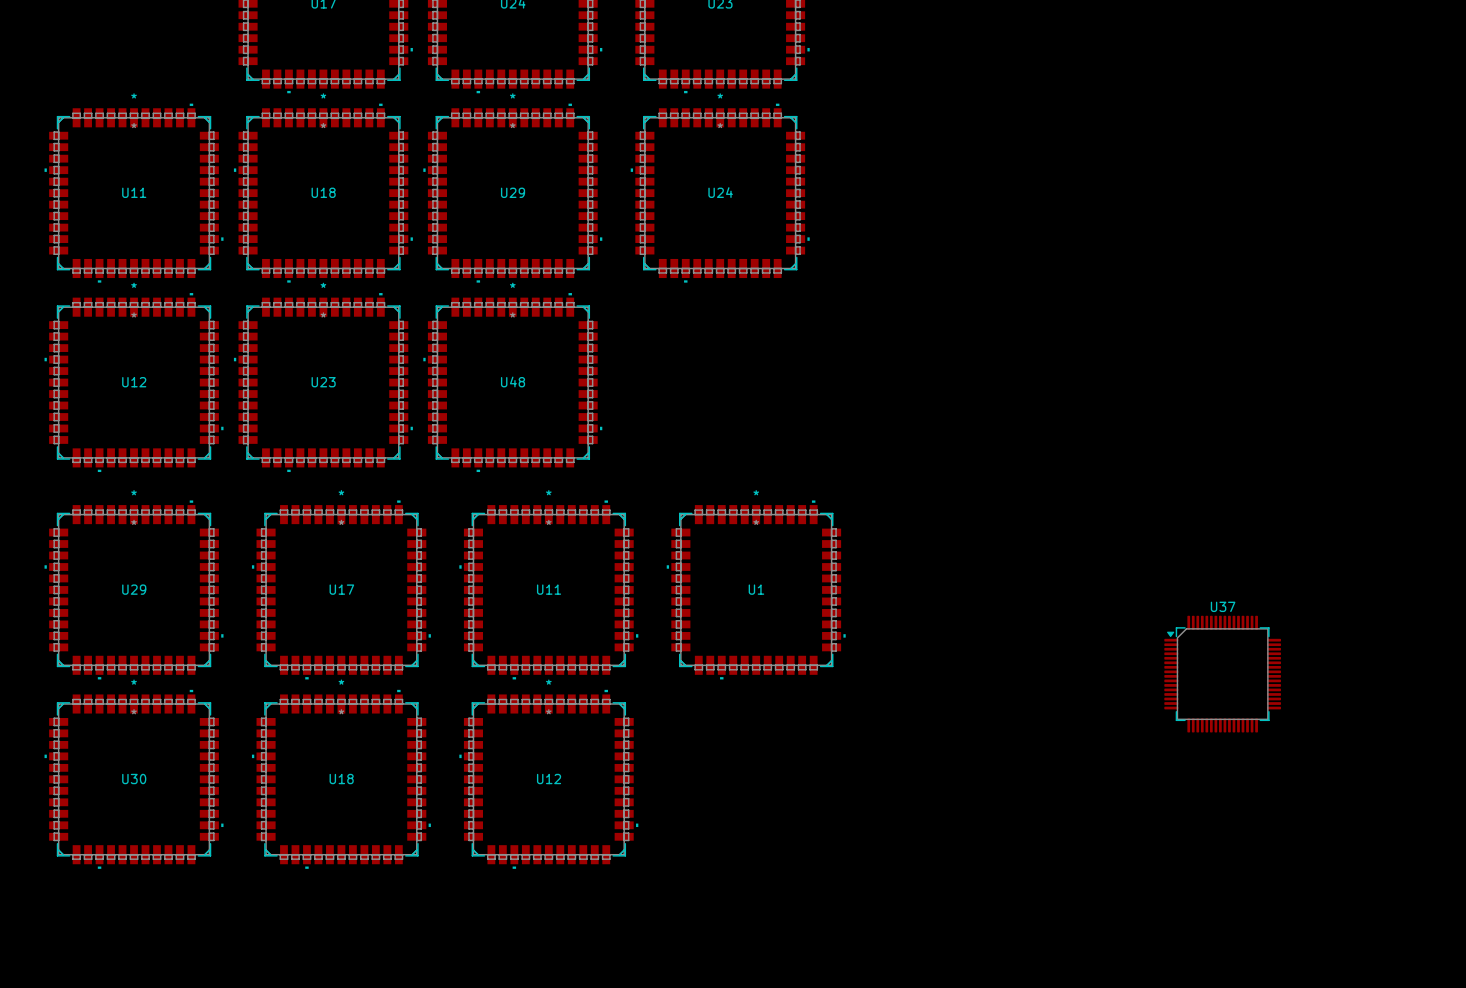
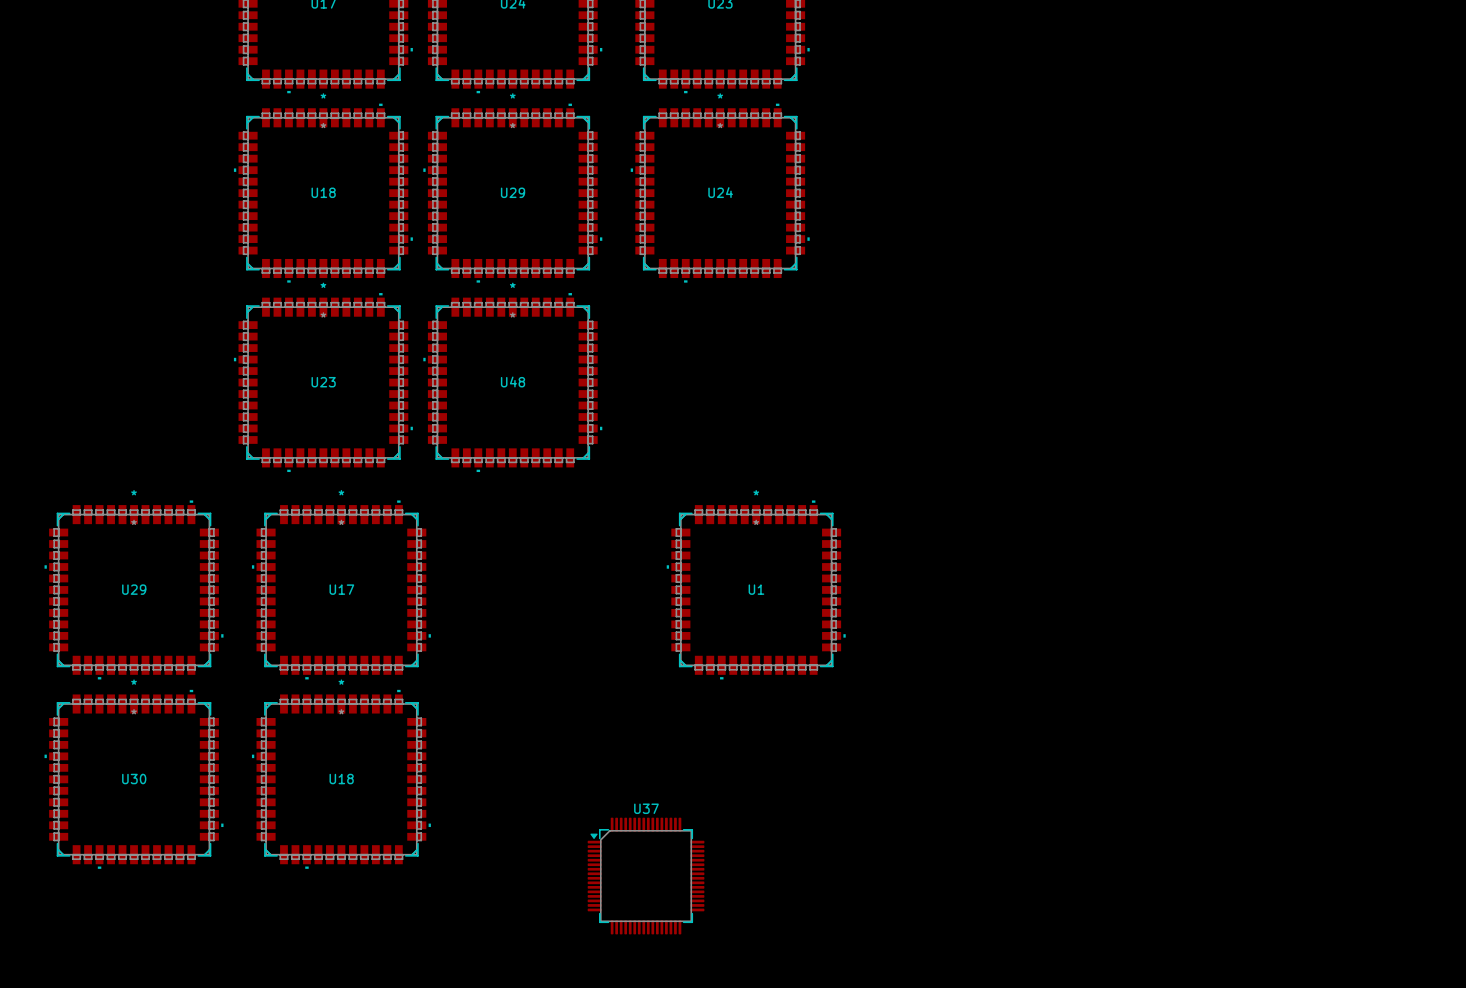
U11: (134, 193) -> none
U12: (134, 382) -> none
U11: (548, 589) -> none
U37 position: (1222, 674) -> (646, 876)
U12: (548, 779) -> none

